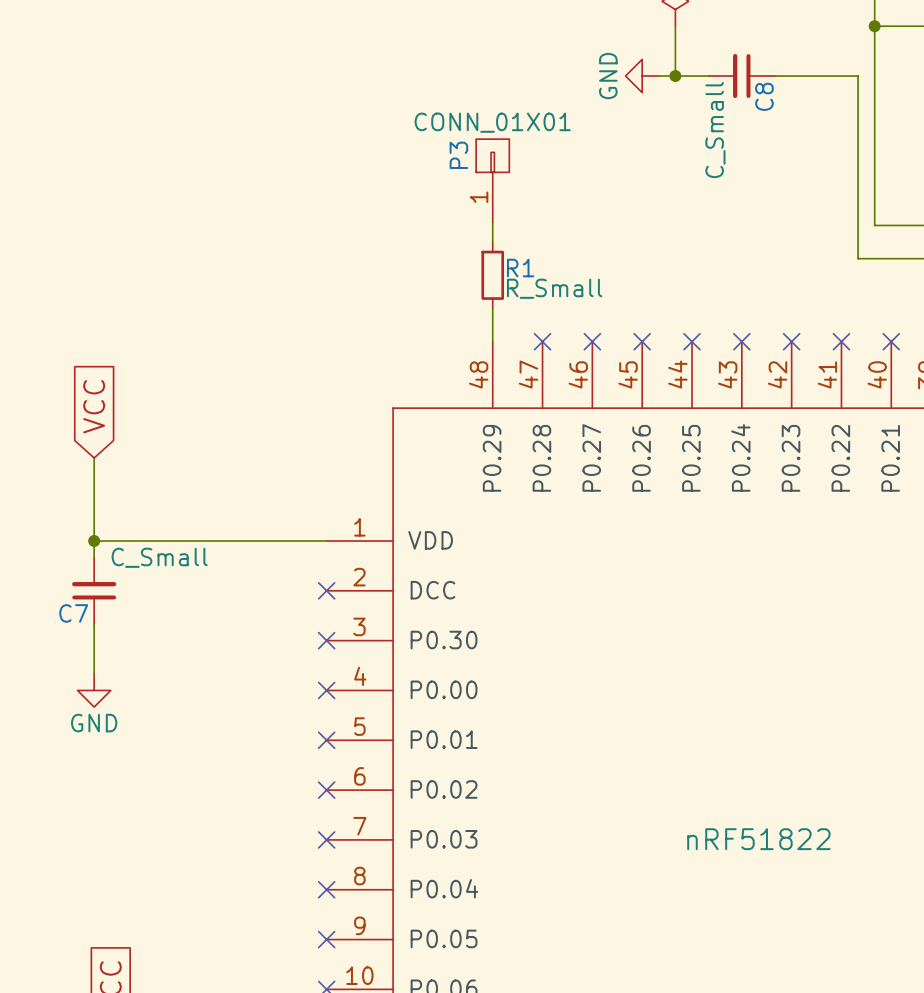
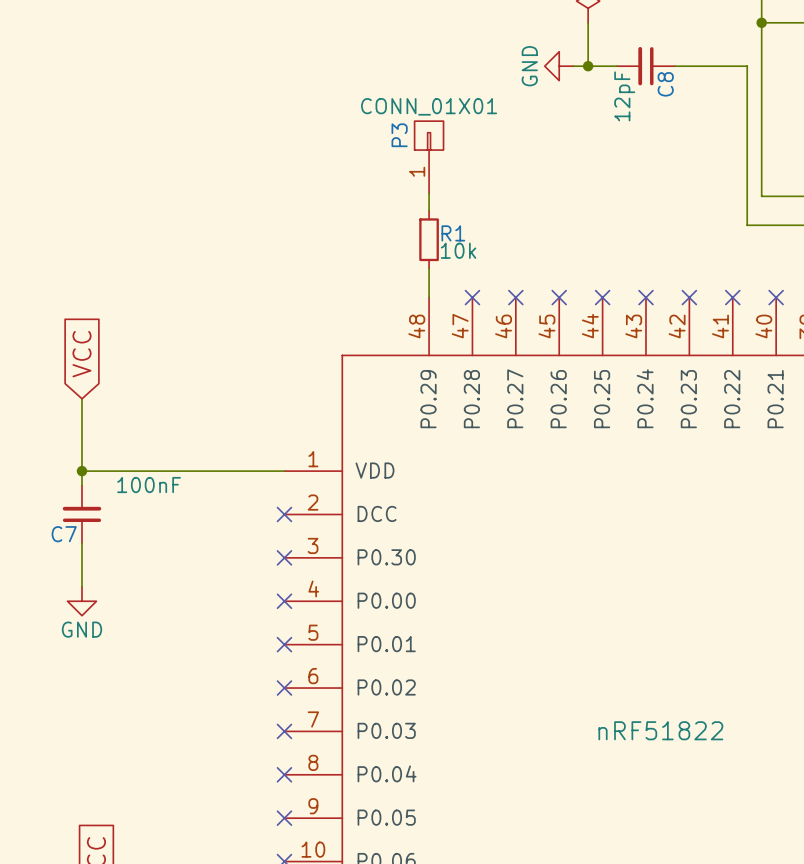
C8 value: C_Small (715, 130) -> 12pF (624, 96)
R1 value: R_Small (554, 288) -> 10k (458, 250)
C7 value: C_Small (159, 557) -> 100nF (149, 485)

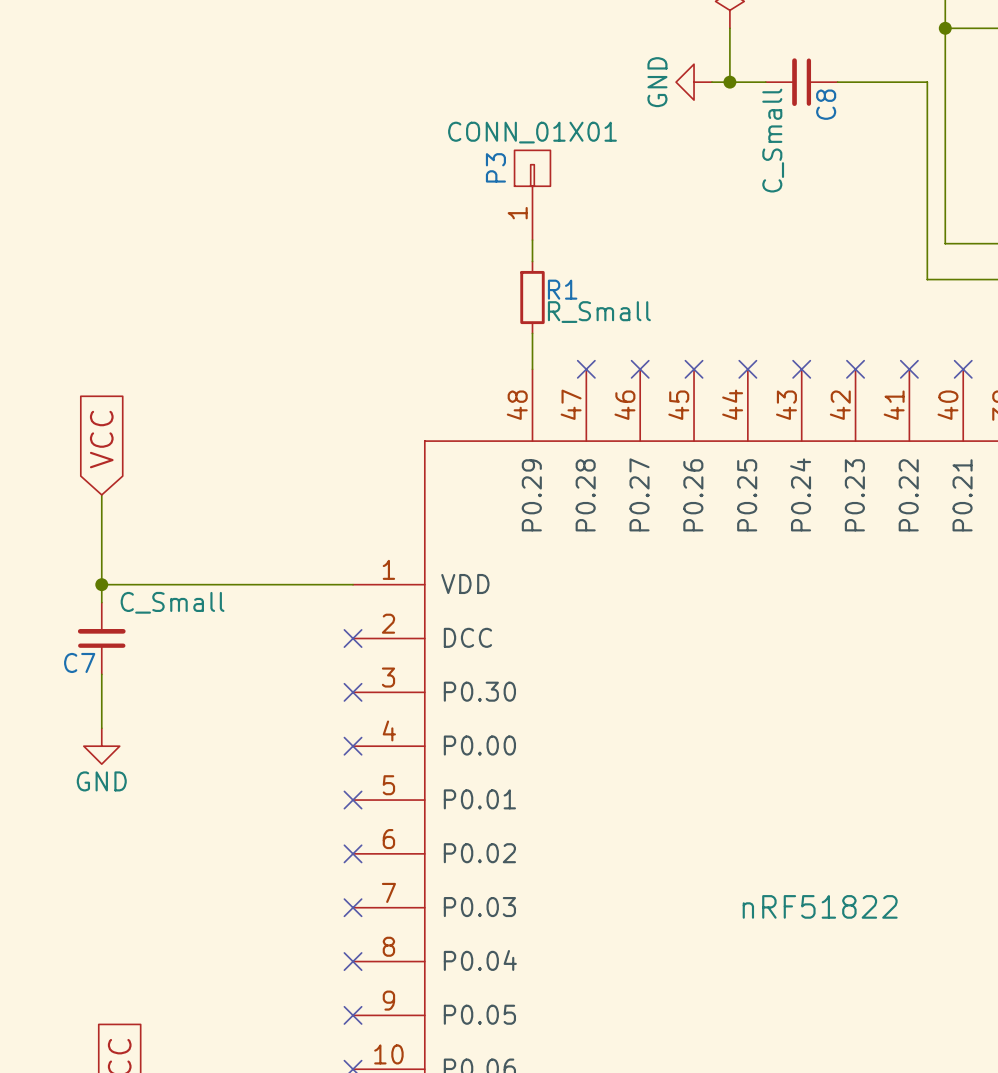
C8 value: 12pF (624, 96) -> C_Small (773, 140)
R1 value: 10k (458, 250) -> R_Small (599, 312)
C7 value: 100nF (149, 485) -> C_Small (172, 602)

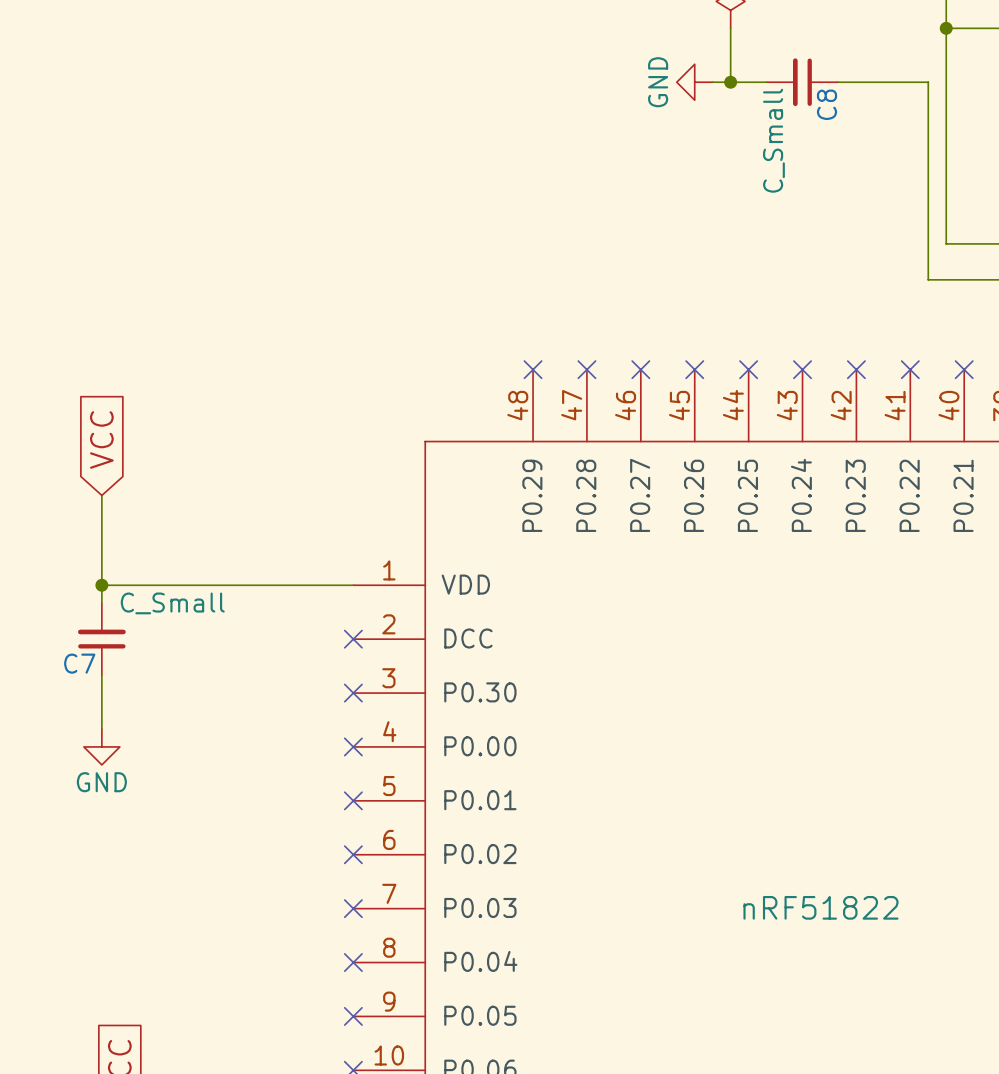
P3: CONN_01X01 (532, 195) -> none
wire: (532, 240) (532, 261) -> none
R1: R_Small (532, 297) -> none
wire: (532, 333) (532, 369) -> none
no-connect mark: none -> (533, 369)

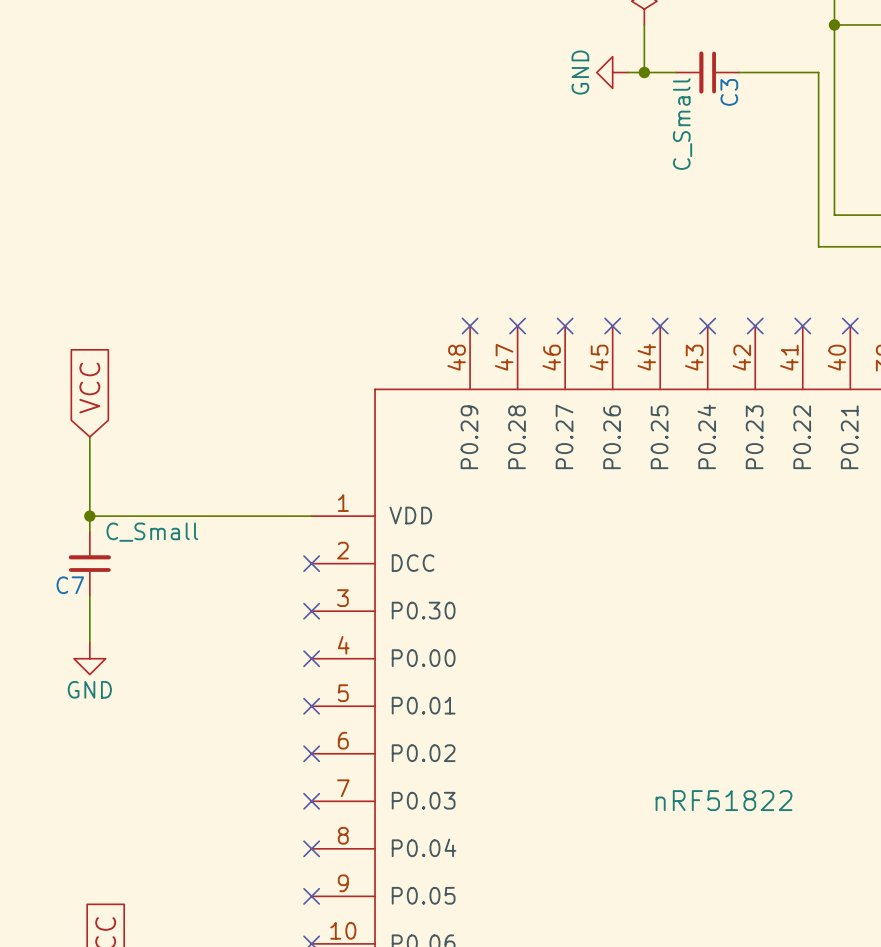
C8 name: C8 (827, 104) -> C3 (729, 92)

